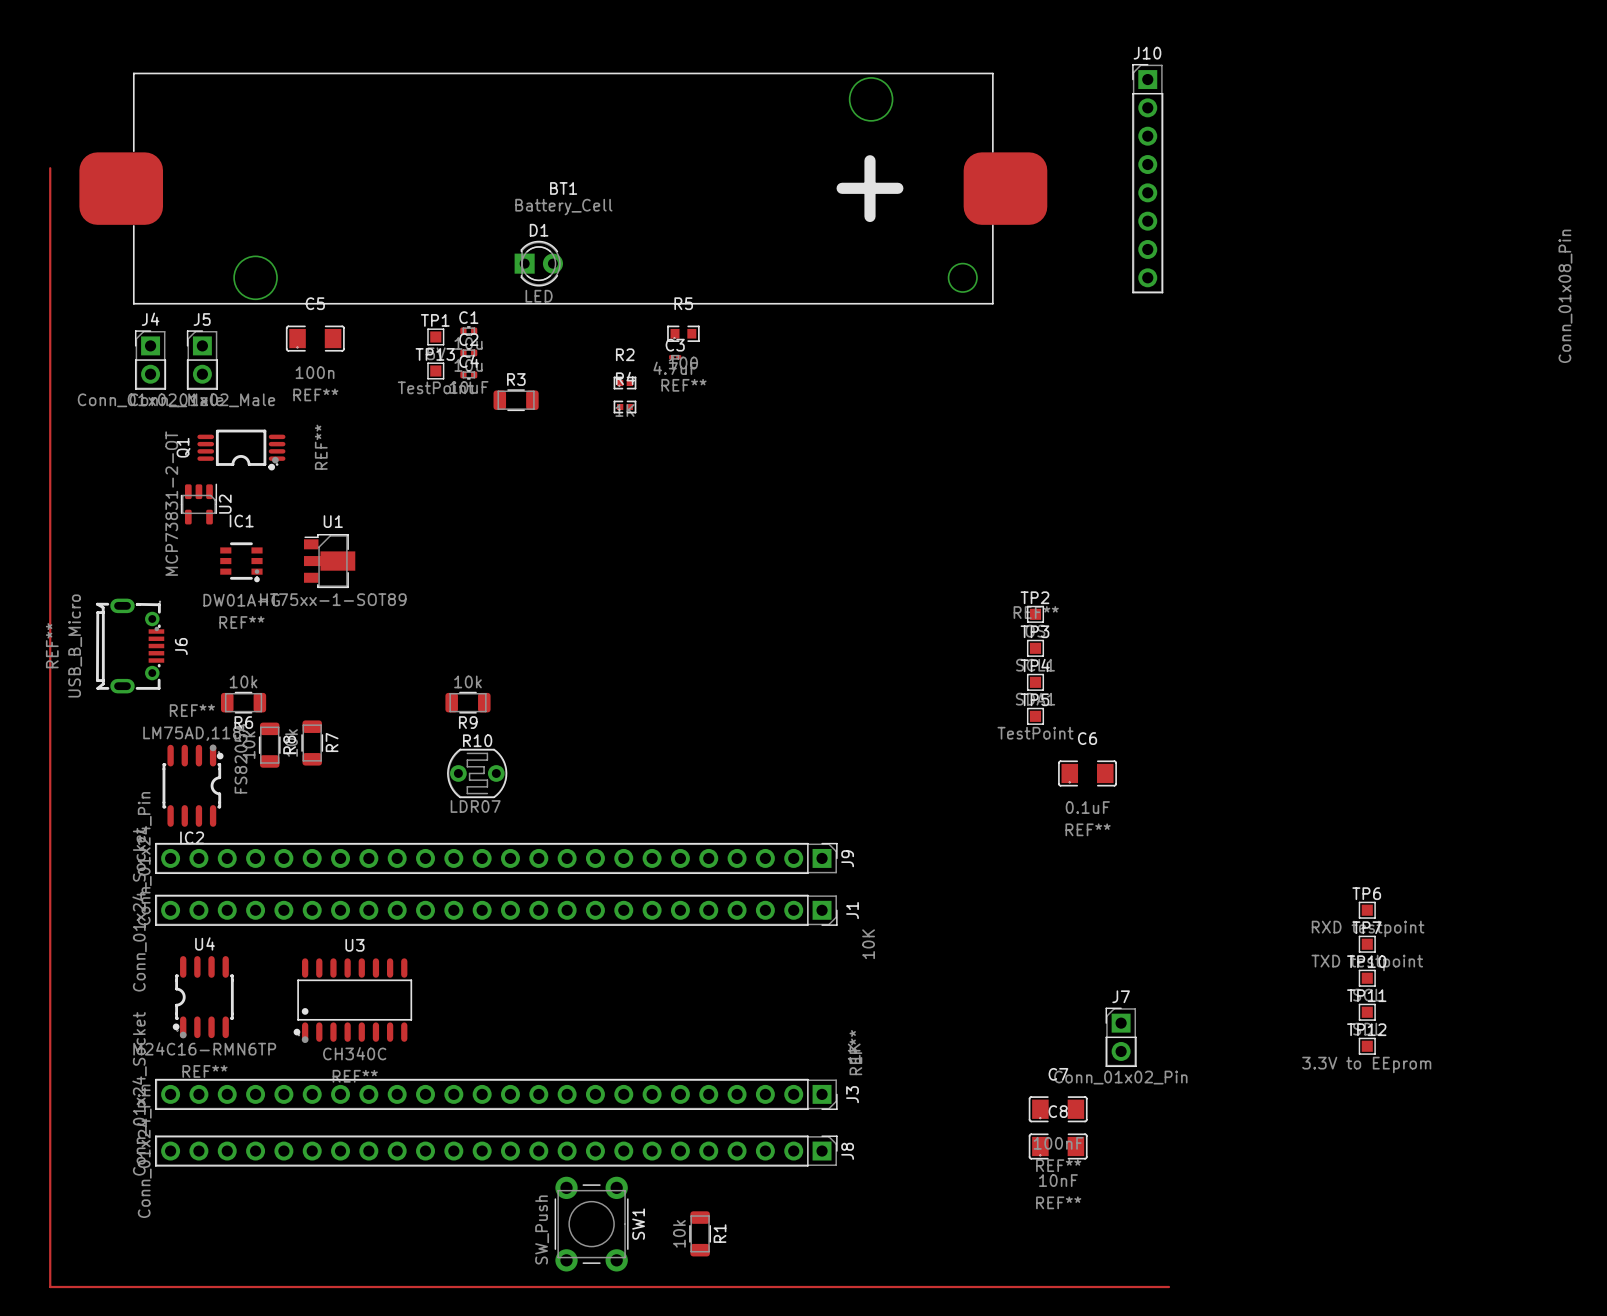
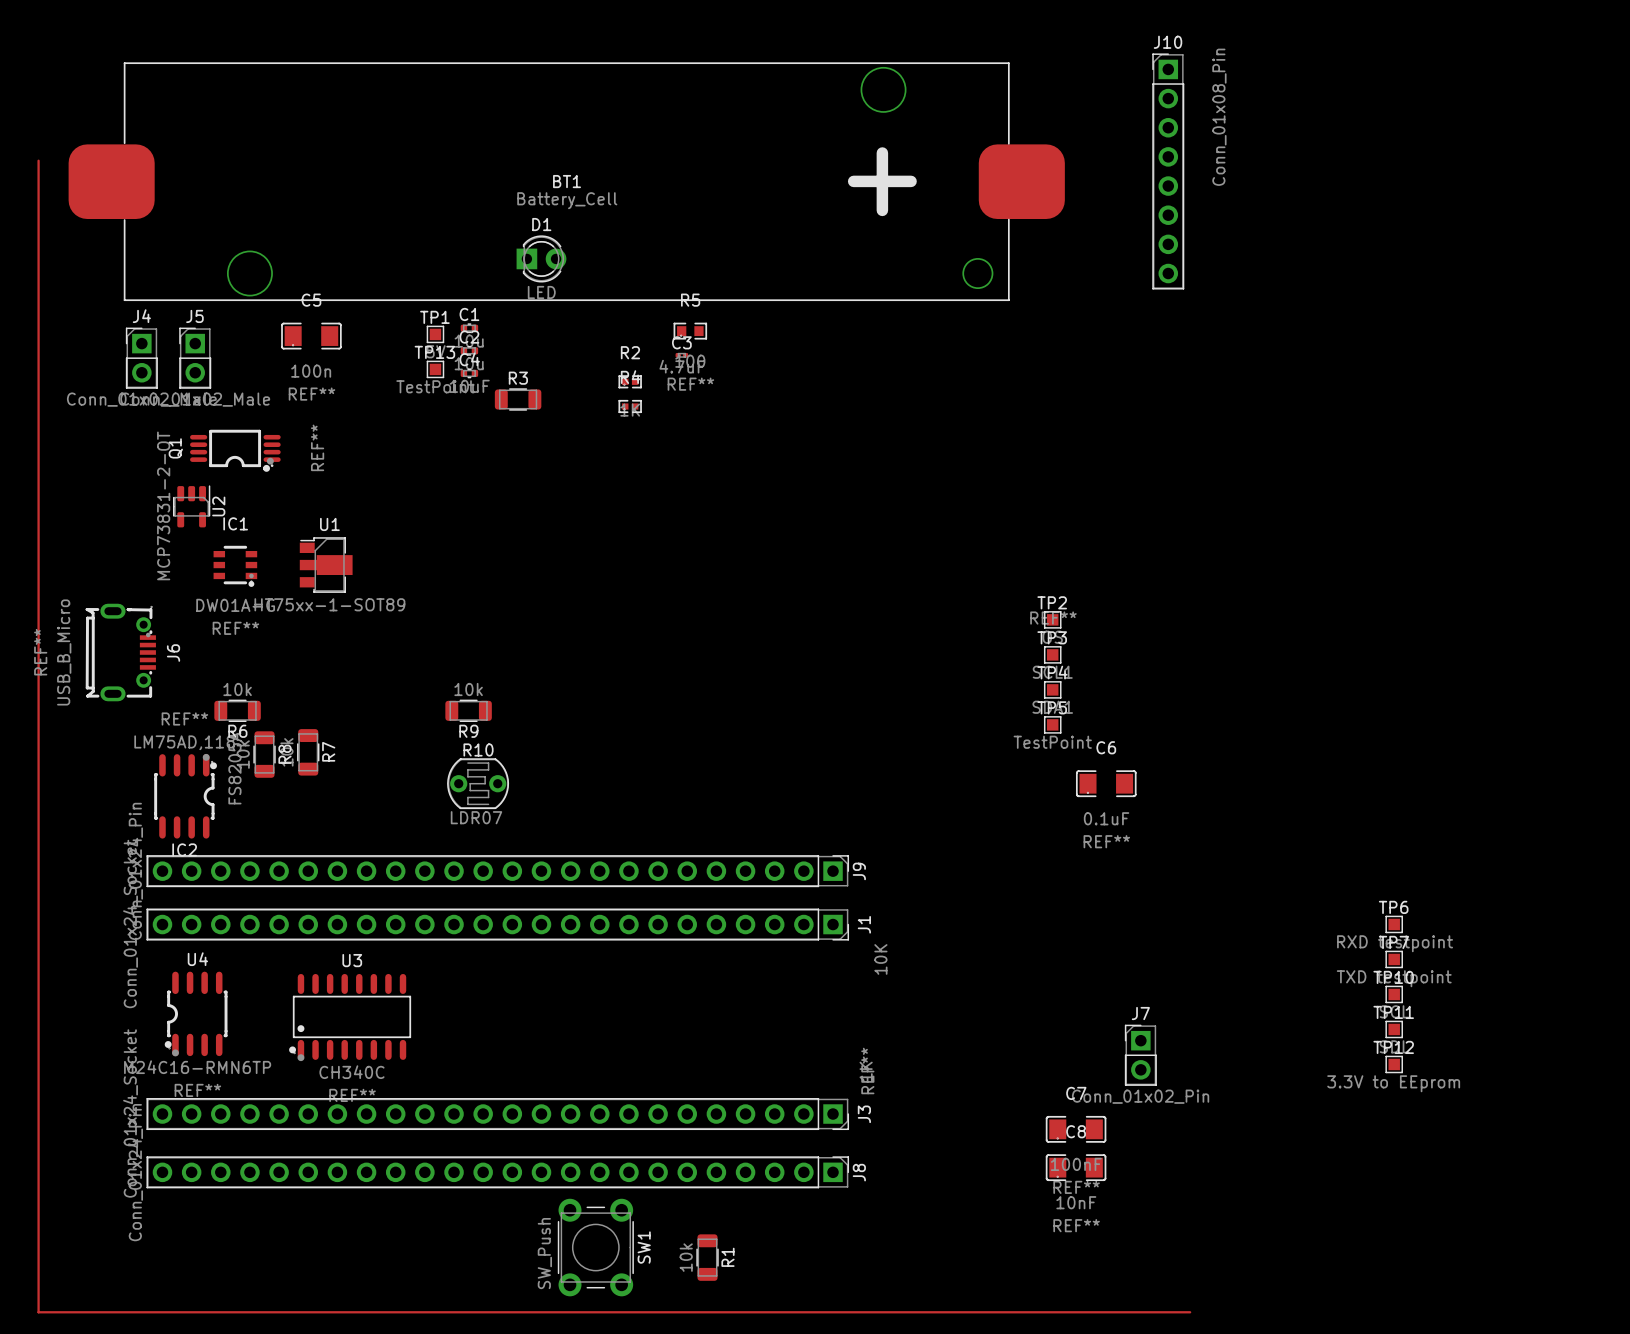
J10 value position: Conn_01x08_Pin (1565, 296) -> Conn_01x08_Pin (1219, 117)

